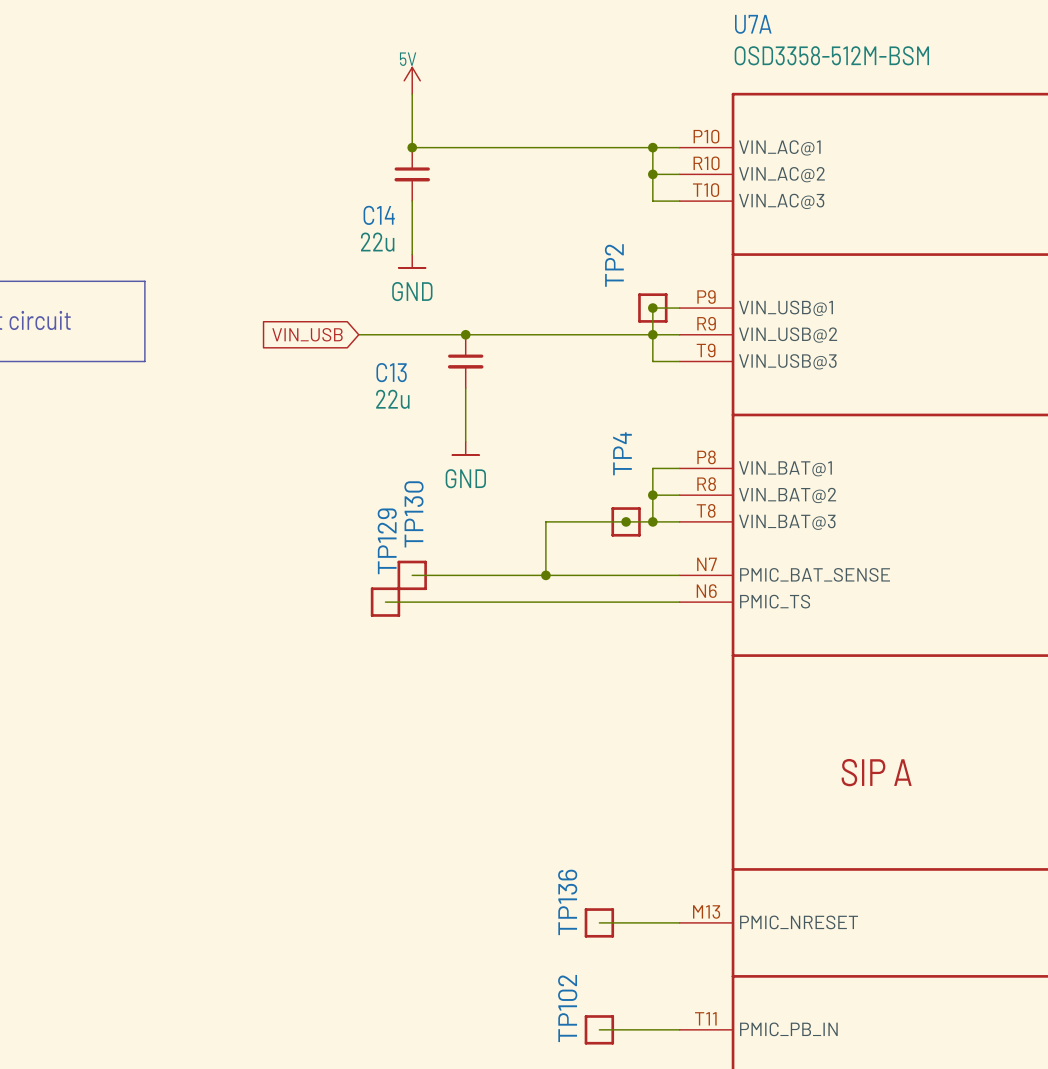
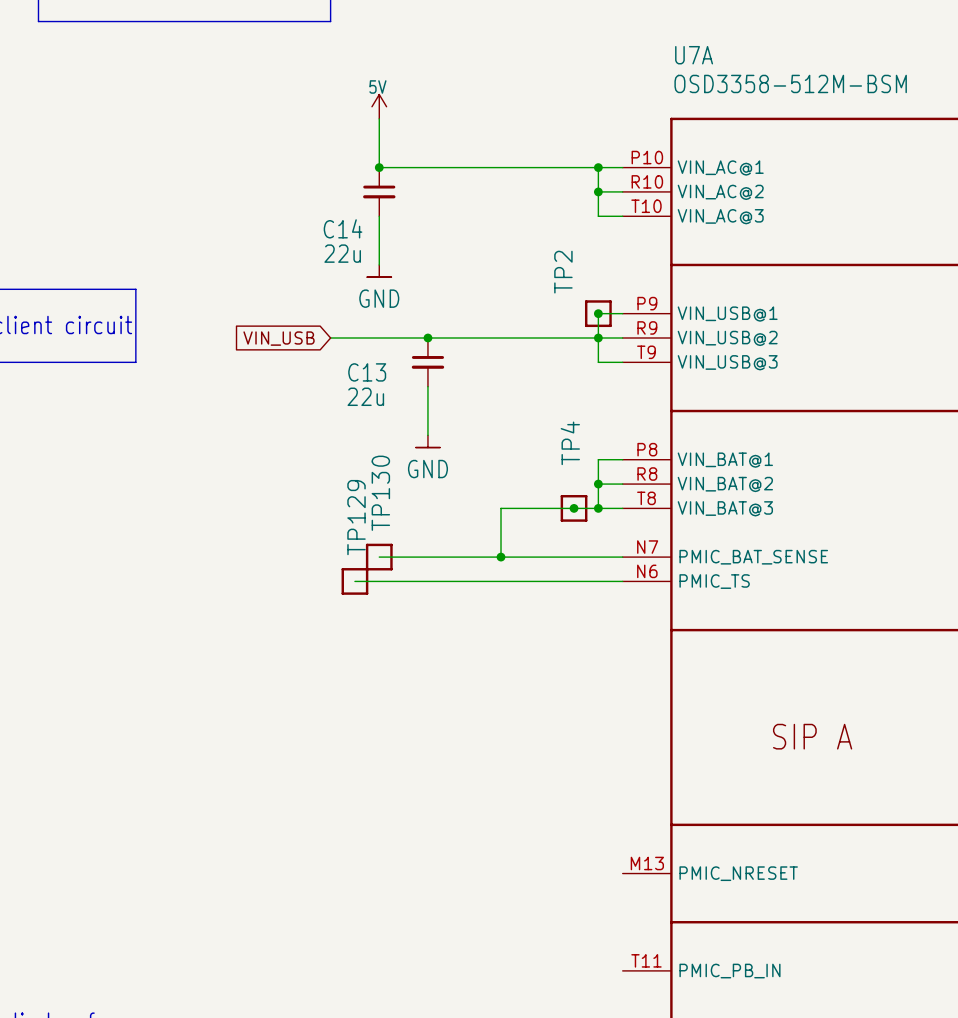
wire: (599, 922) (679, 922) -> none
TP136: (599, 922) -> none
wire: (599, 1029) (679, 1029) -> none
TP102: (599, 1029) -> none

